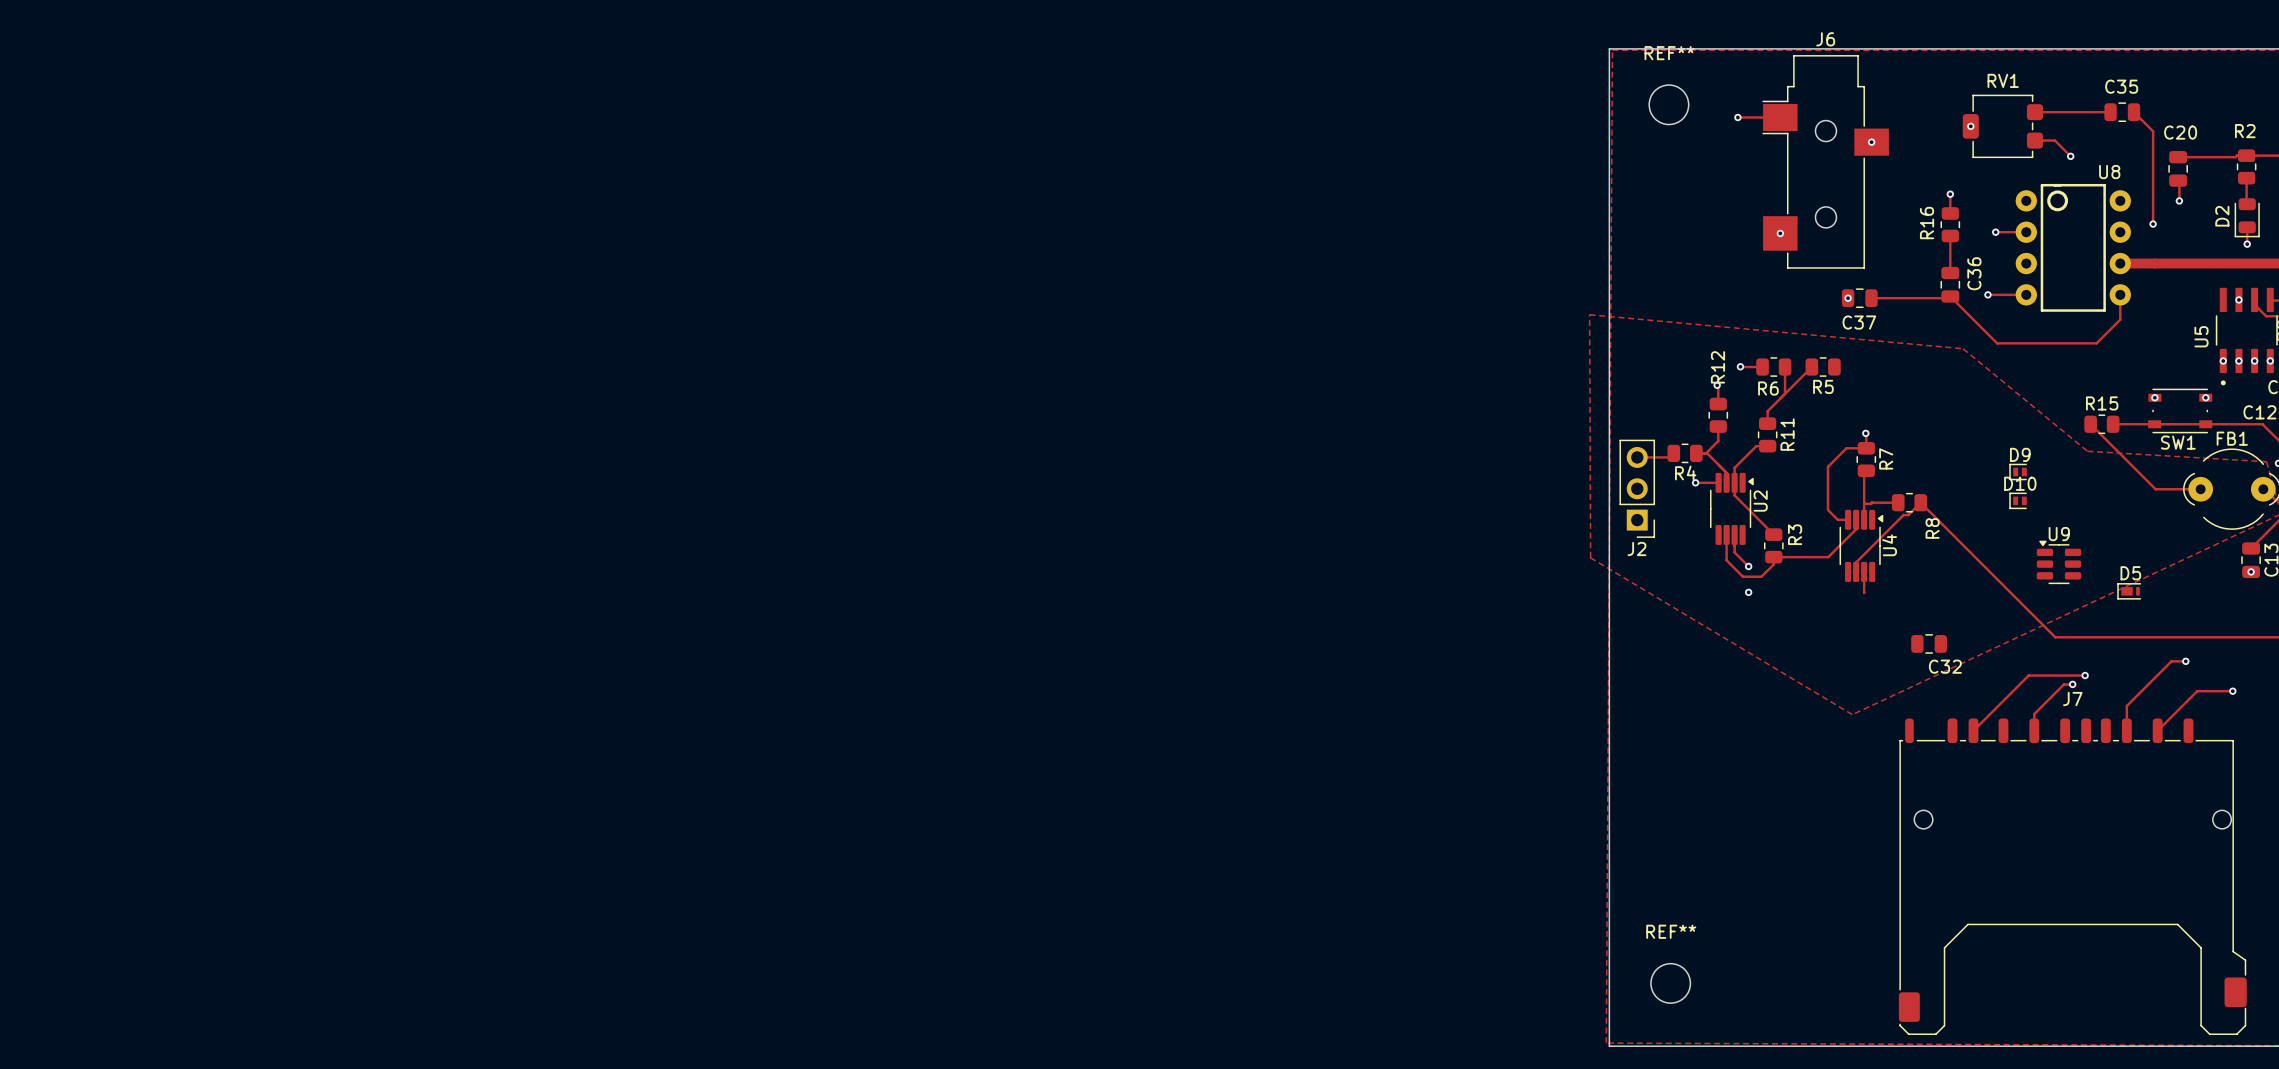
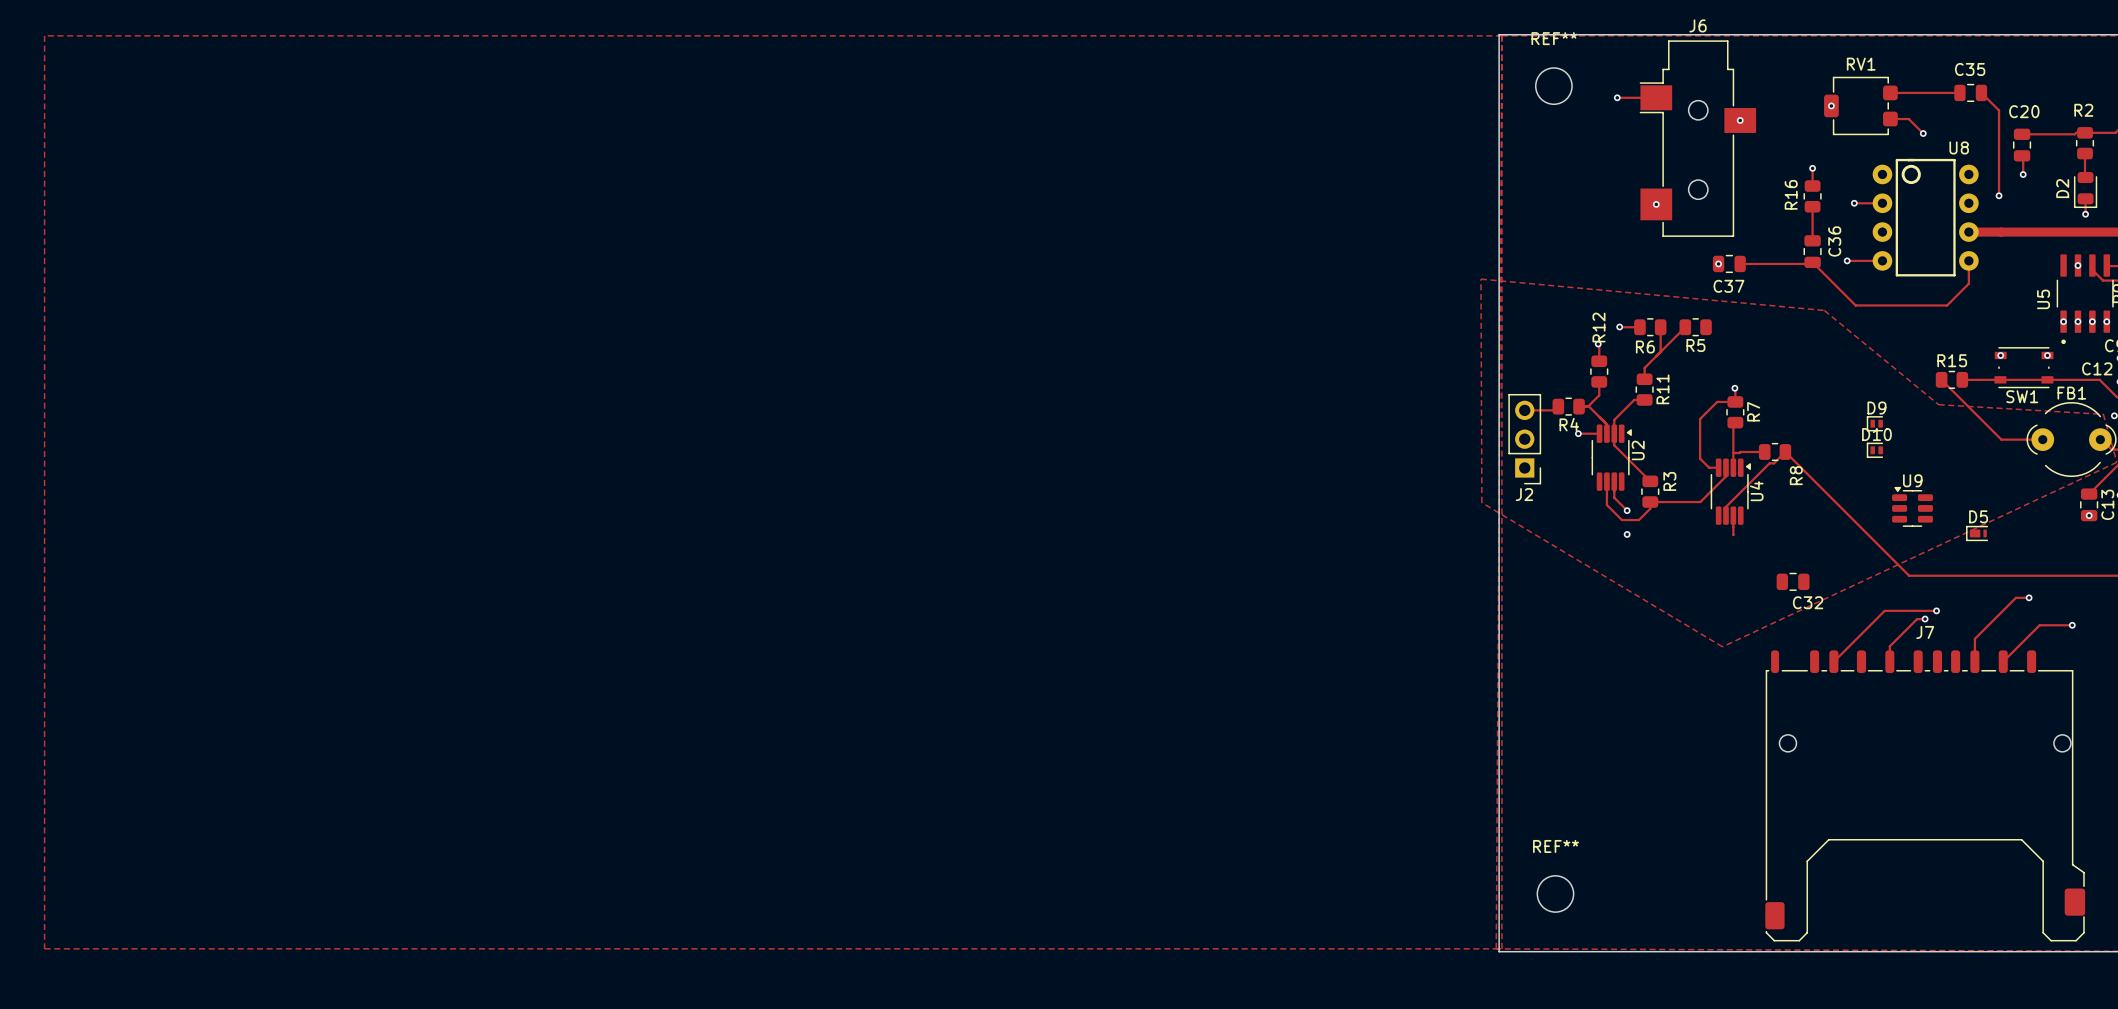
zone outline: none -> (44, 35) (1501, 35) (1501, 948) (44, 948) (44, 35)

